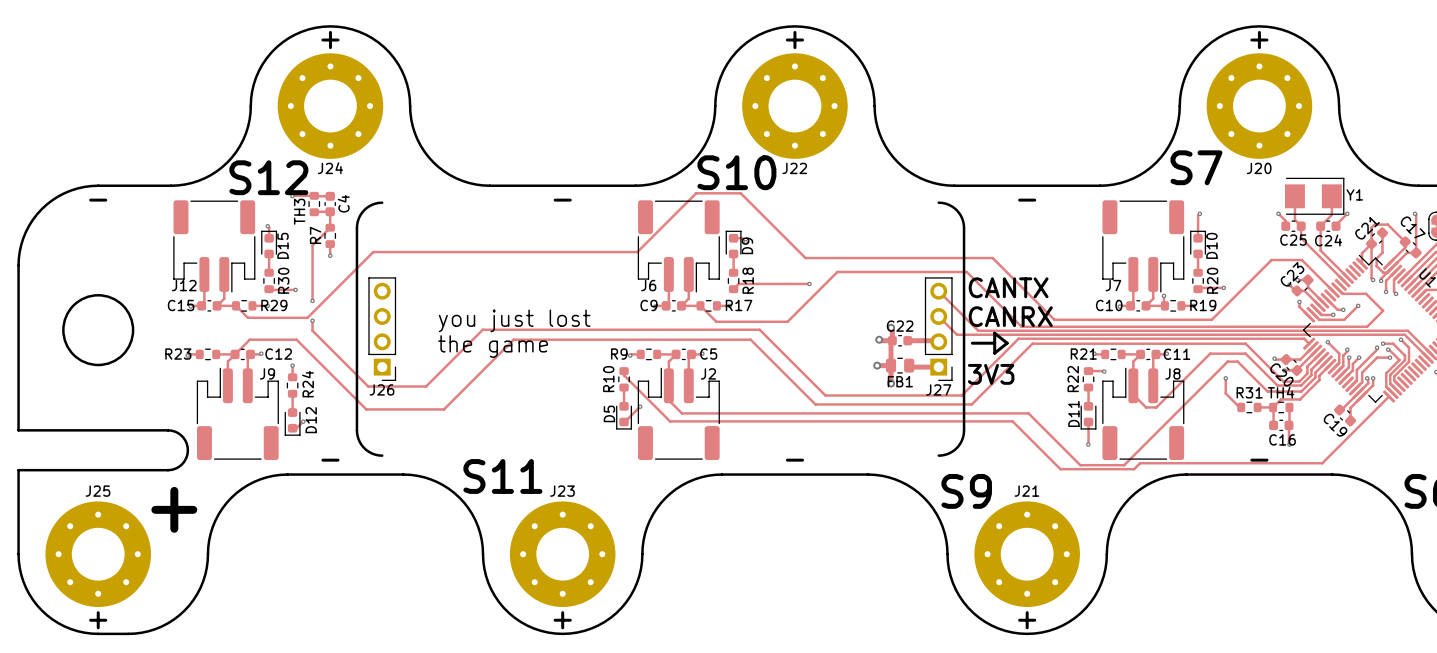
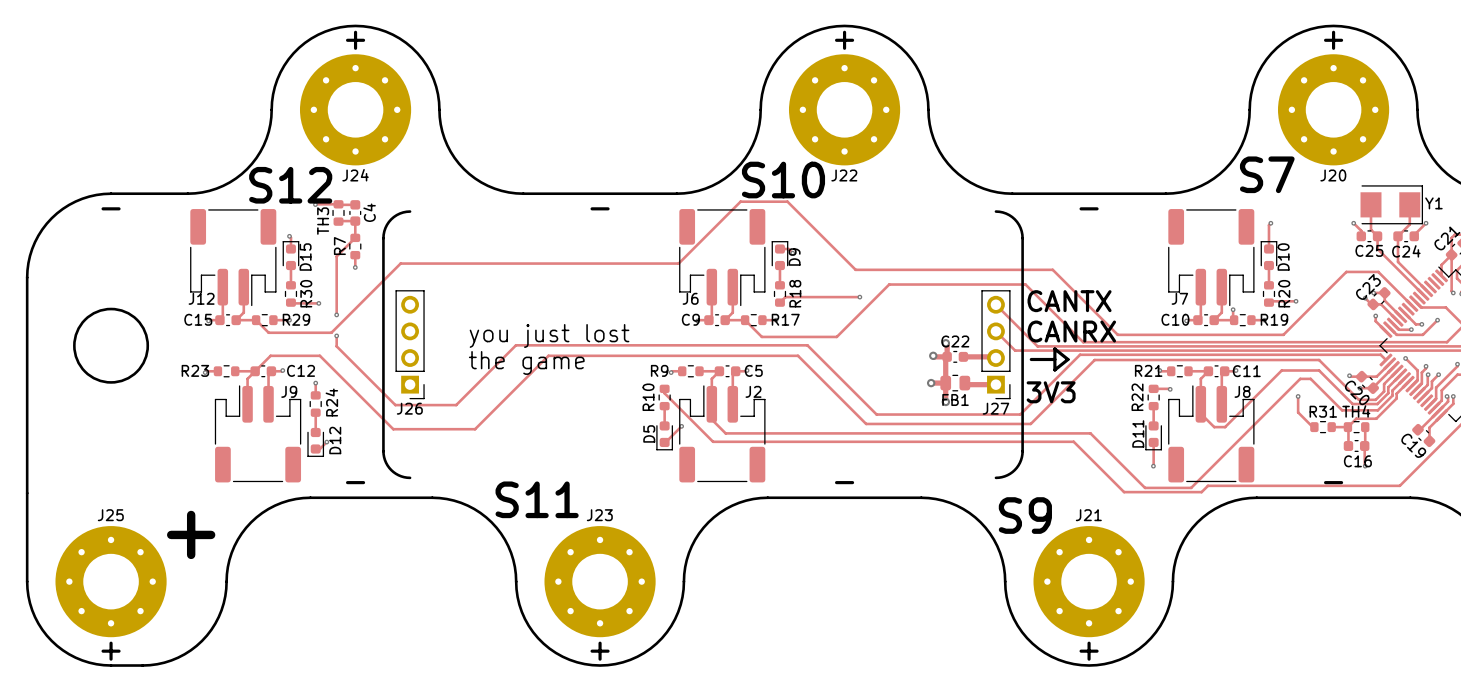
board edge: (18, 430) (170, 430) (182, 436) (186, 442) (187, 450) (186, 457) (182, 464) (170, 470) (18, 470) -> (27, 451) (27, 493)

